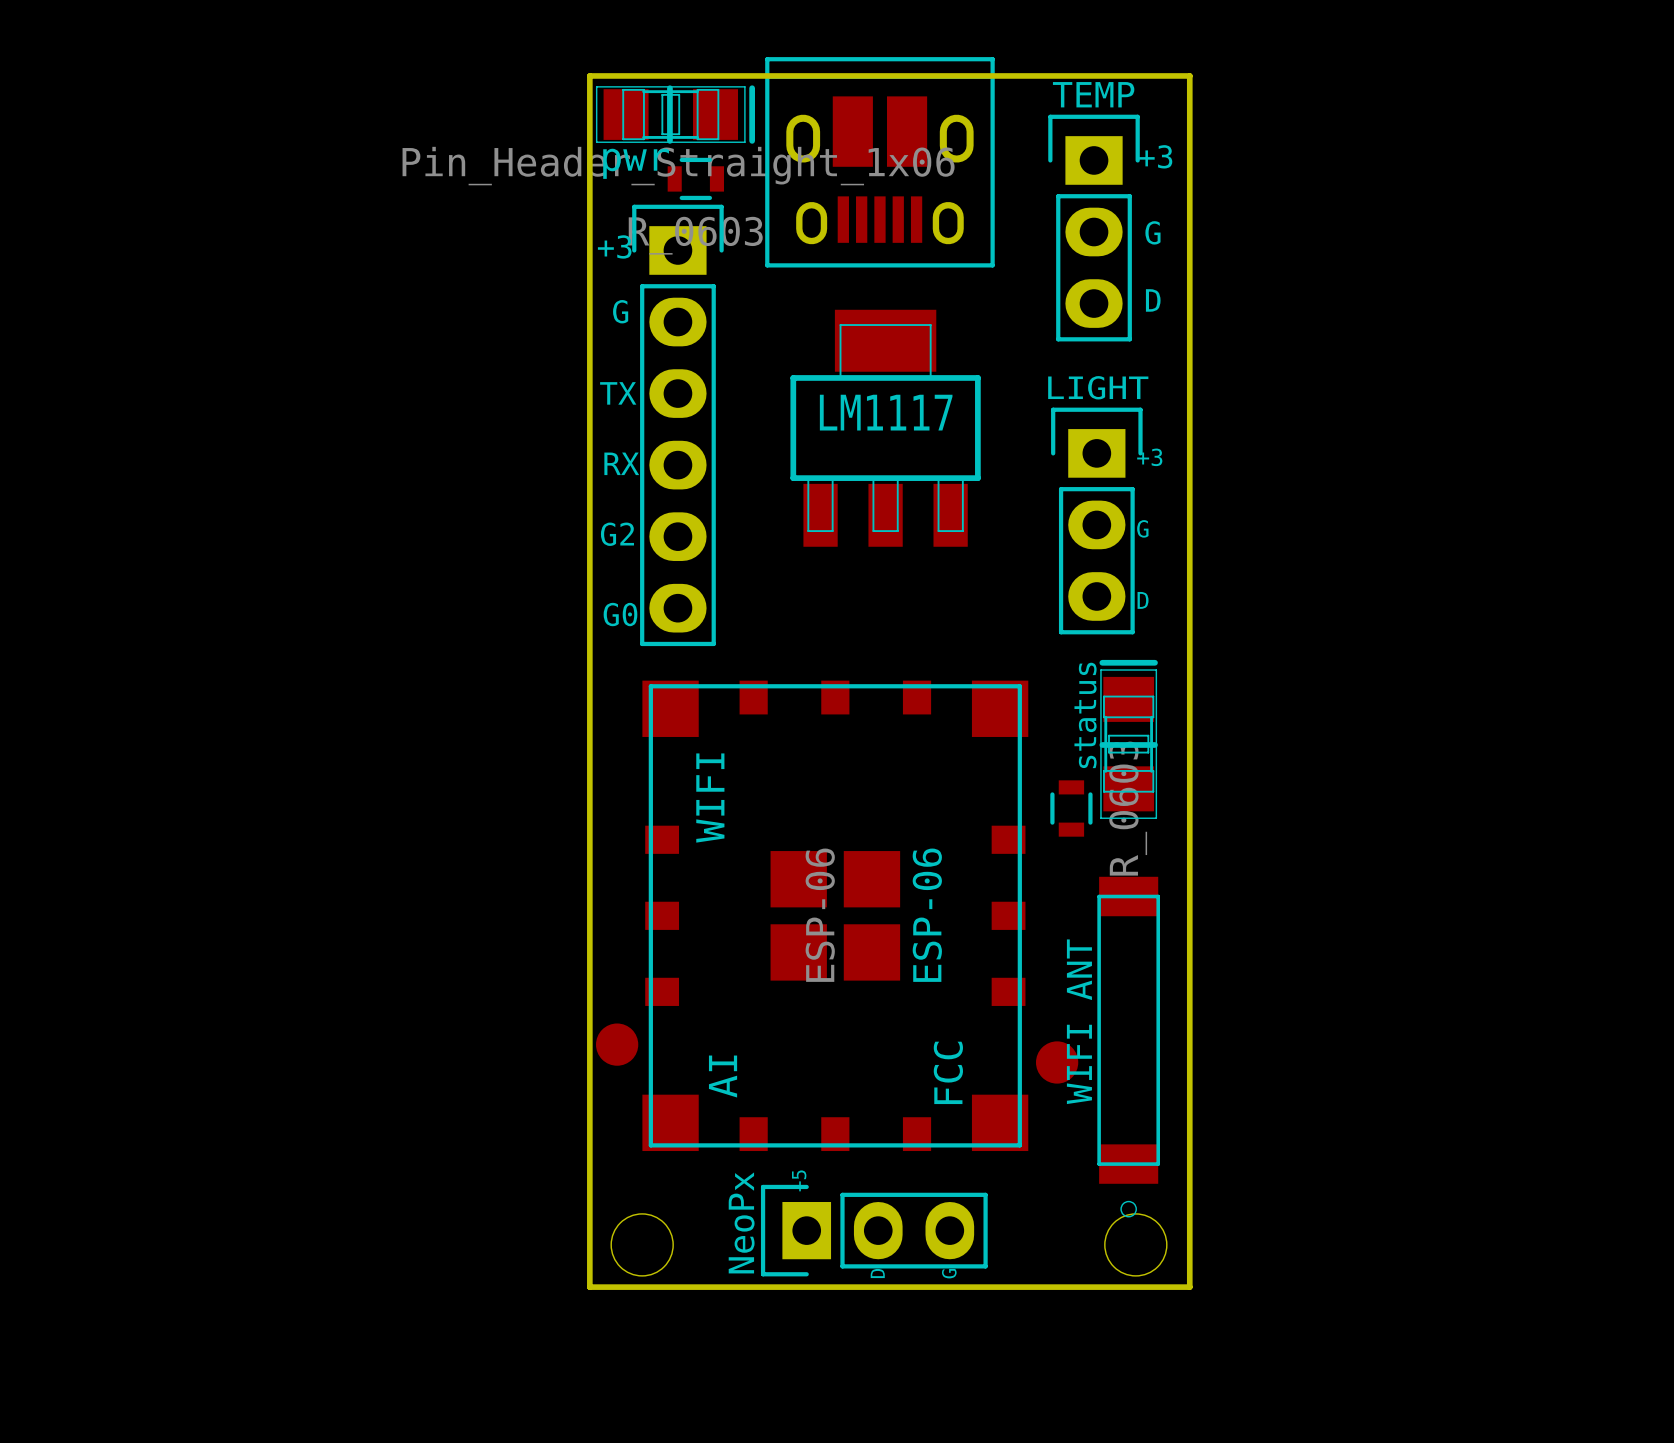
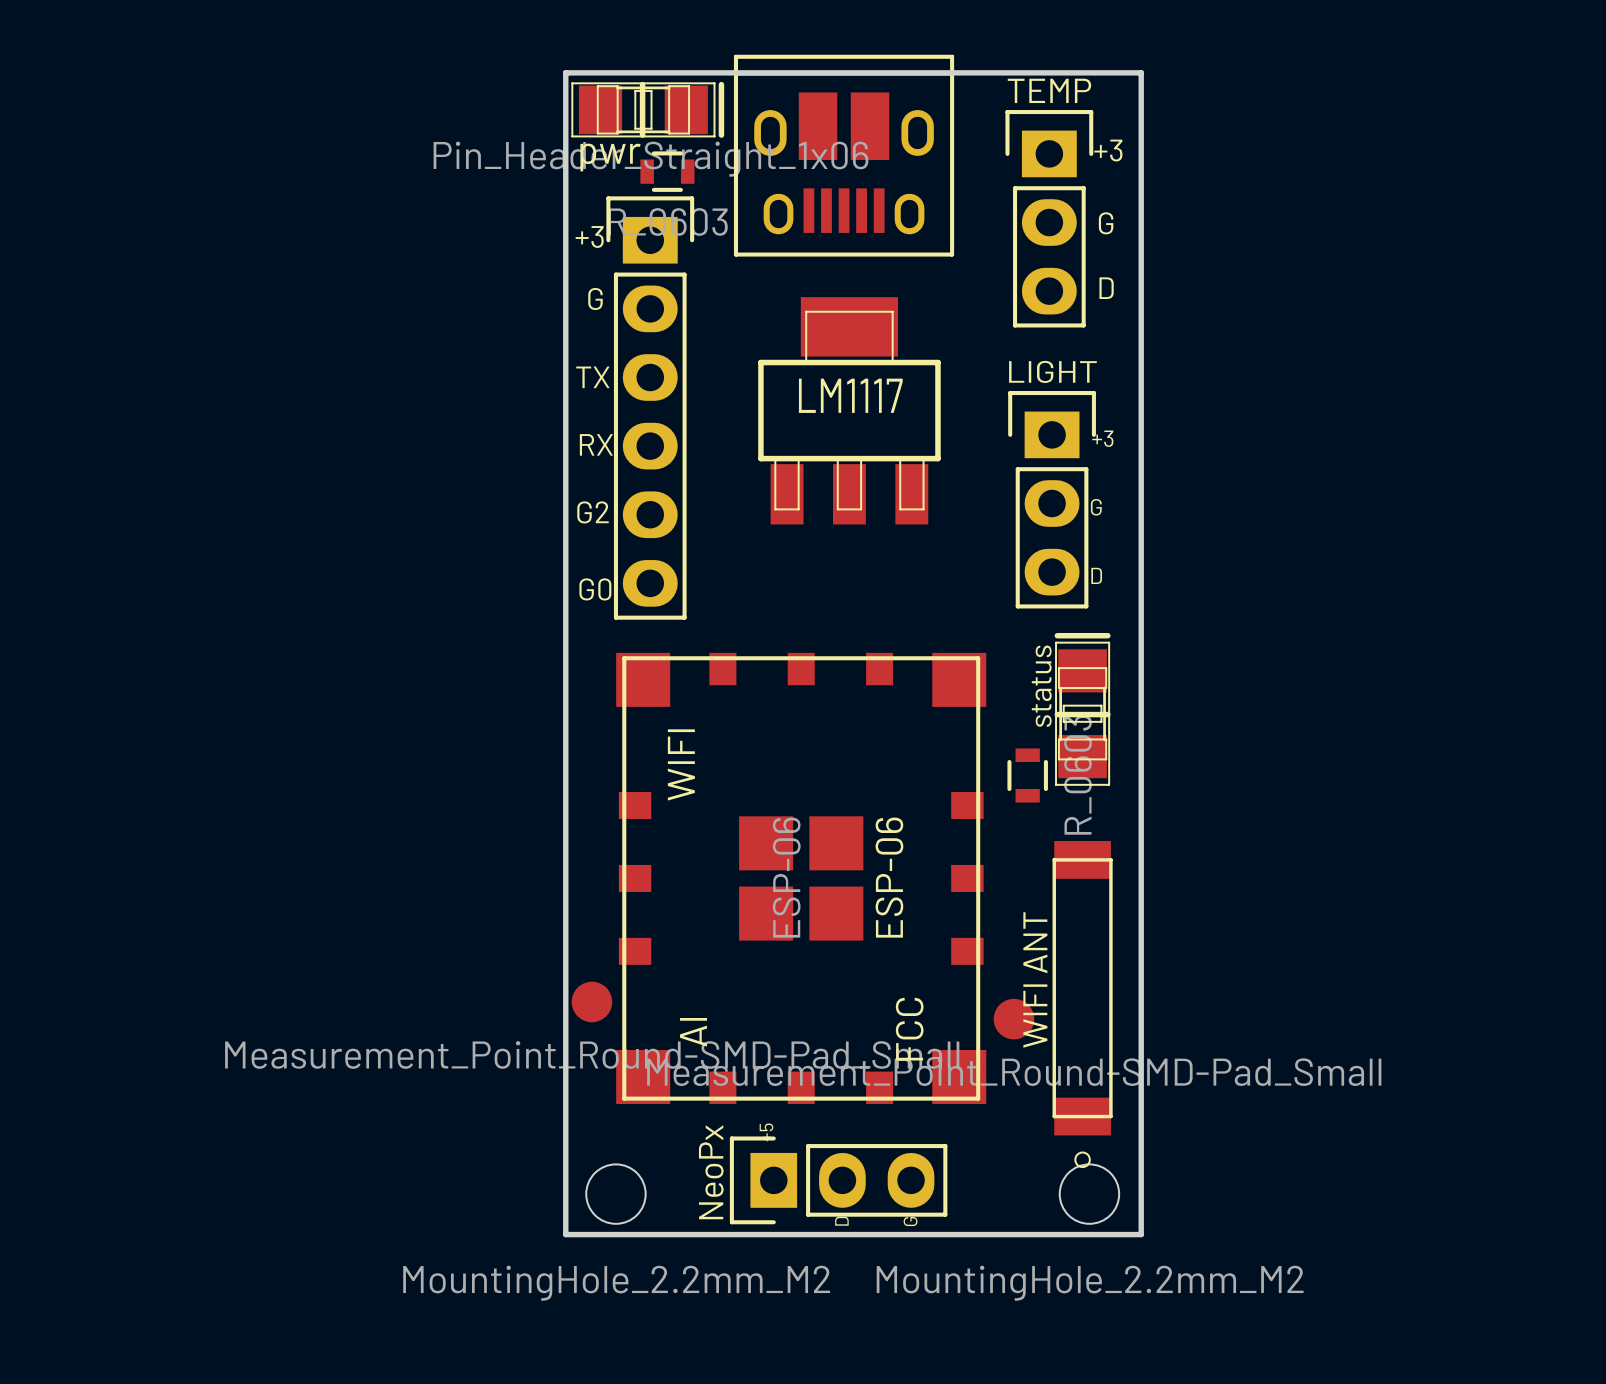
part value: none -> Measurement_Point_Round-SMD-Pad_Small (592, 1054)
part value: none -> Measurement_Point_Round-SMD-Pad_Small (1014, 1072)
part value: none -> MountingHole_2.2mm_M2 (616, 1283)
part value: none -> MountingHole_2.2mm_M2 (1090, 1283)

